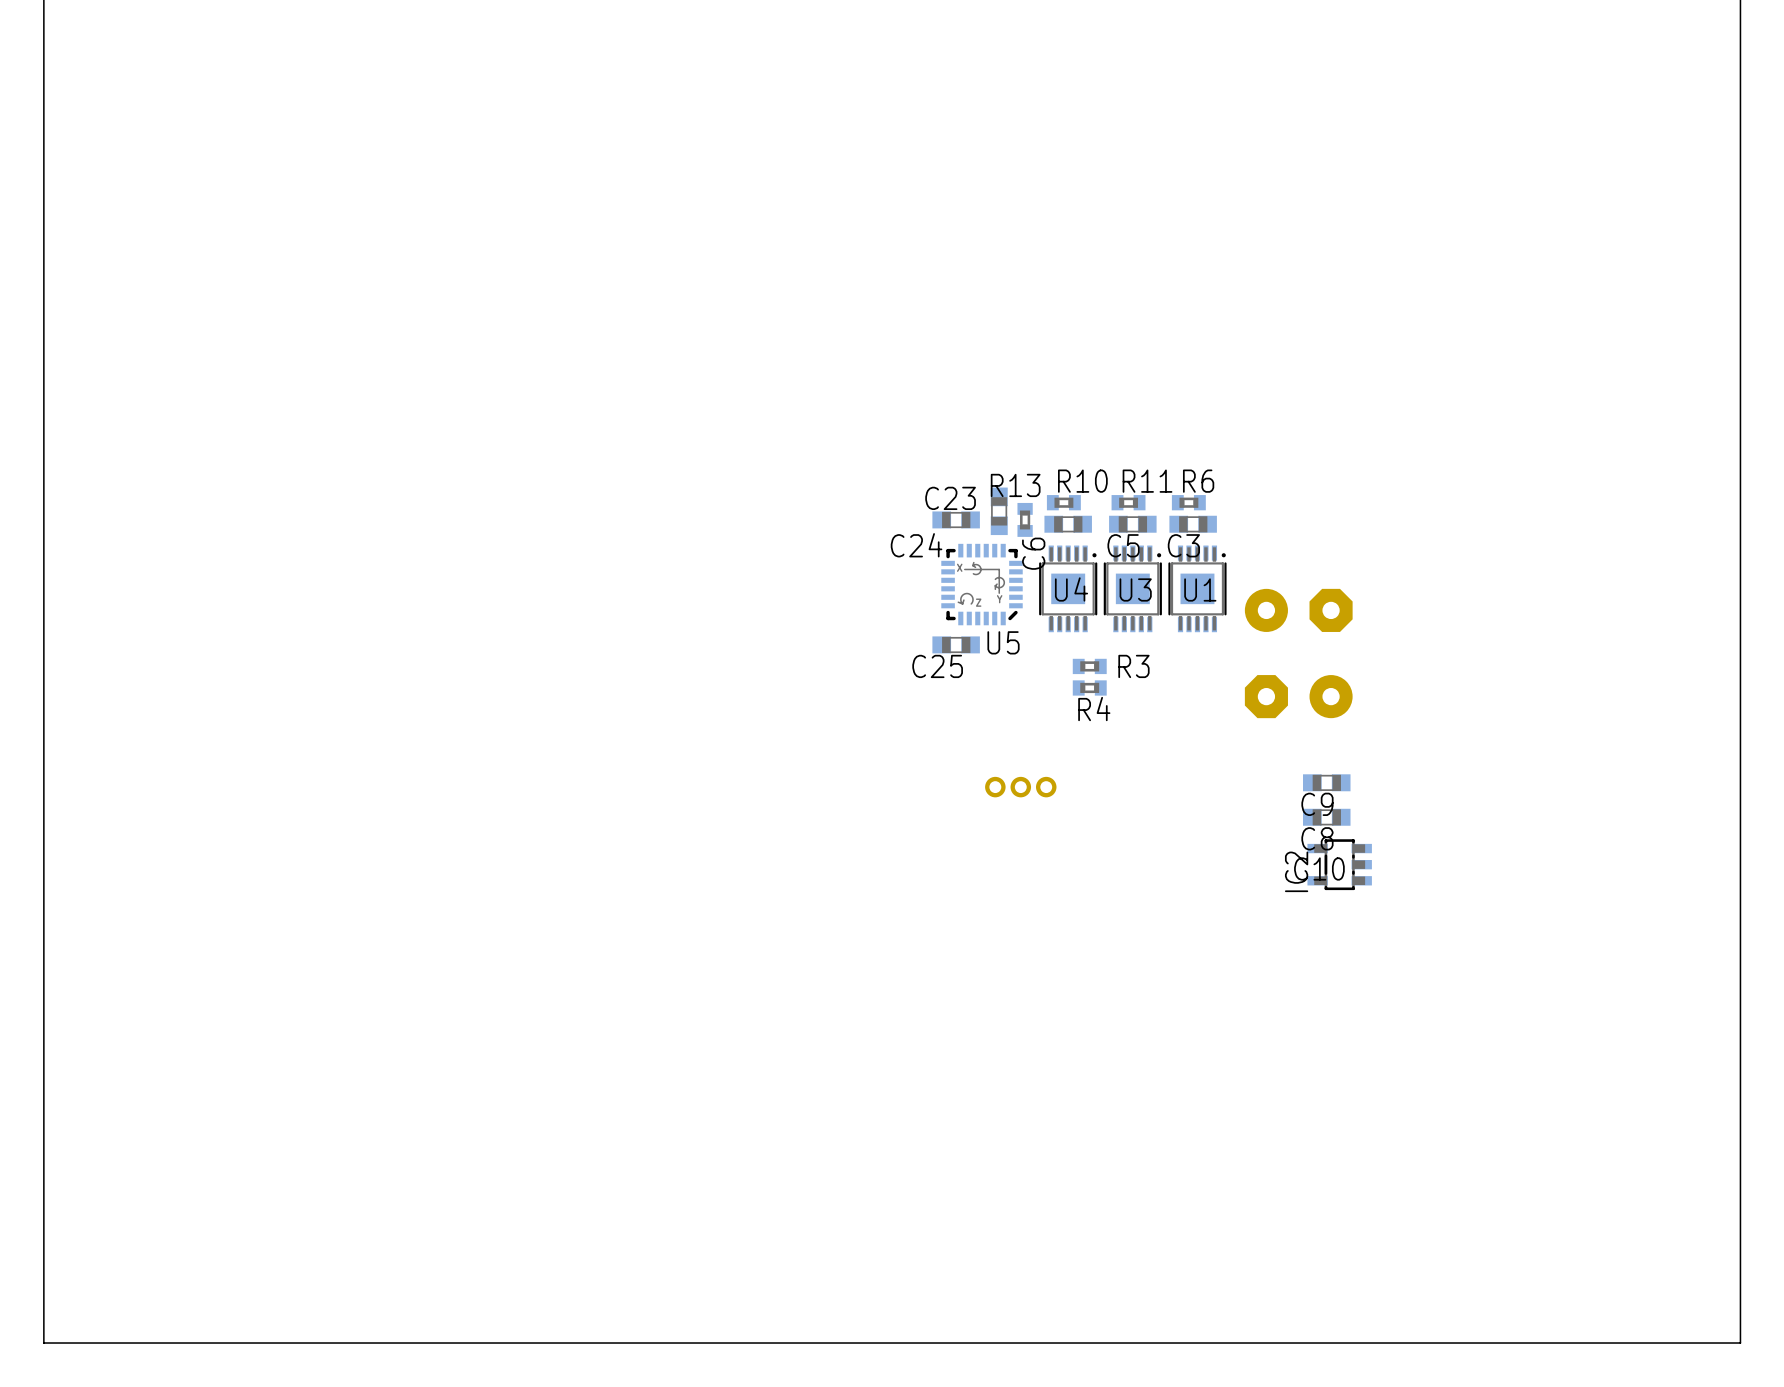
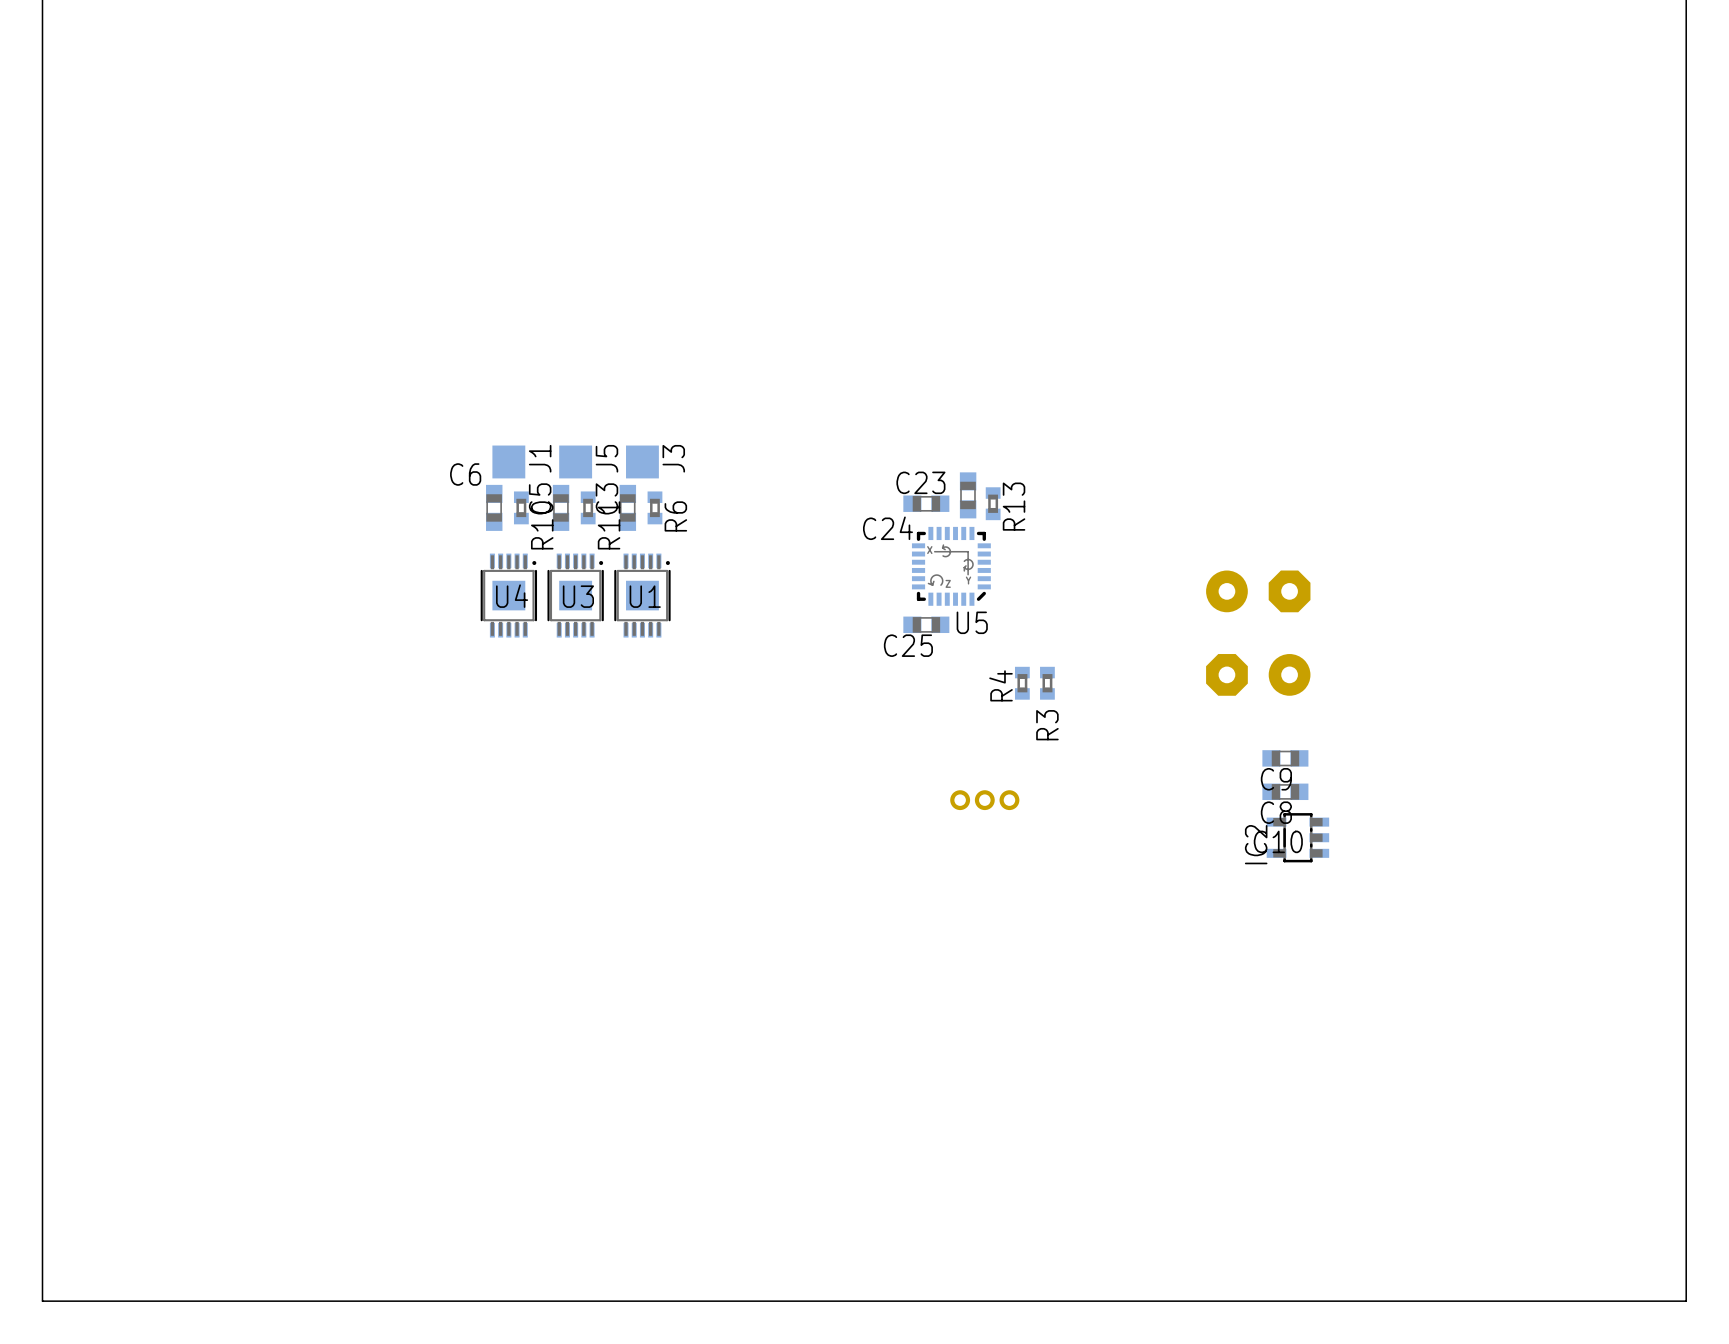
J1: none -> (508, 461)
J5: none -> (575, 461)
J3: none -> (642, 461)
R13 name rotation: 0° (1015, 485) -> 90° counterclockwise (1014, 506)
R10 rotation: 0° (1063, 502) -> 90° clockwise (521, 507)
R10 position: (1063, 502) -> (521, 507)
R11 rotation: 0° (1128, 502) -> 90° clockwise (588, 507)
R11 position: (1128, 502) -> (588, 507)
R6 rotation: 0° (1188, 502) -> 90° clockwise (654, 507)
R6 position: (1188, 502) -> (654, 507)
C6 rotation: 0° (1068, 524) -> 90° clockwise (494, 507)
C6 position: (1068, 524) -> (494, 507)
C5 rotation: 0° (1132, 524) -> 90° clockwise (561, 507)
C5 position: (1132, 524) -> (561, 507)
C3 rotation: 0° (1193, 524) -> 90° clockwise (627, 507)
C3 position: (1193, 524) -> (627, 507)
U4 position: (1068, 588) -> (508, 595)
U3 position: (1132, 588) -> (575, 595)
U1 position: (1197, 588) -> (642, 595)
R3 rotation: 0° (1089, 666) -> 90° clockwise (1047, 683)
R3 position: (1089, 666) -> (1047, 683)
R4 rotation: 0° (1089, 687) -> 90° clockwise (1022, 683)
R4 position: (1089, 687) -> (1022, 683)
part position: (1020, 787) -> (984, 800)

